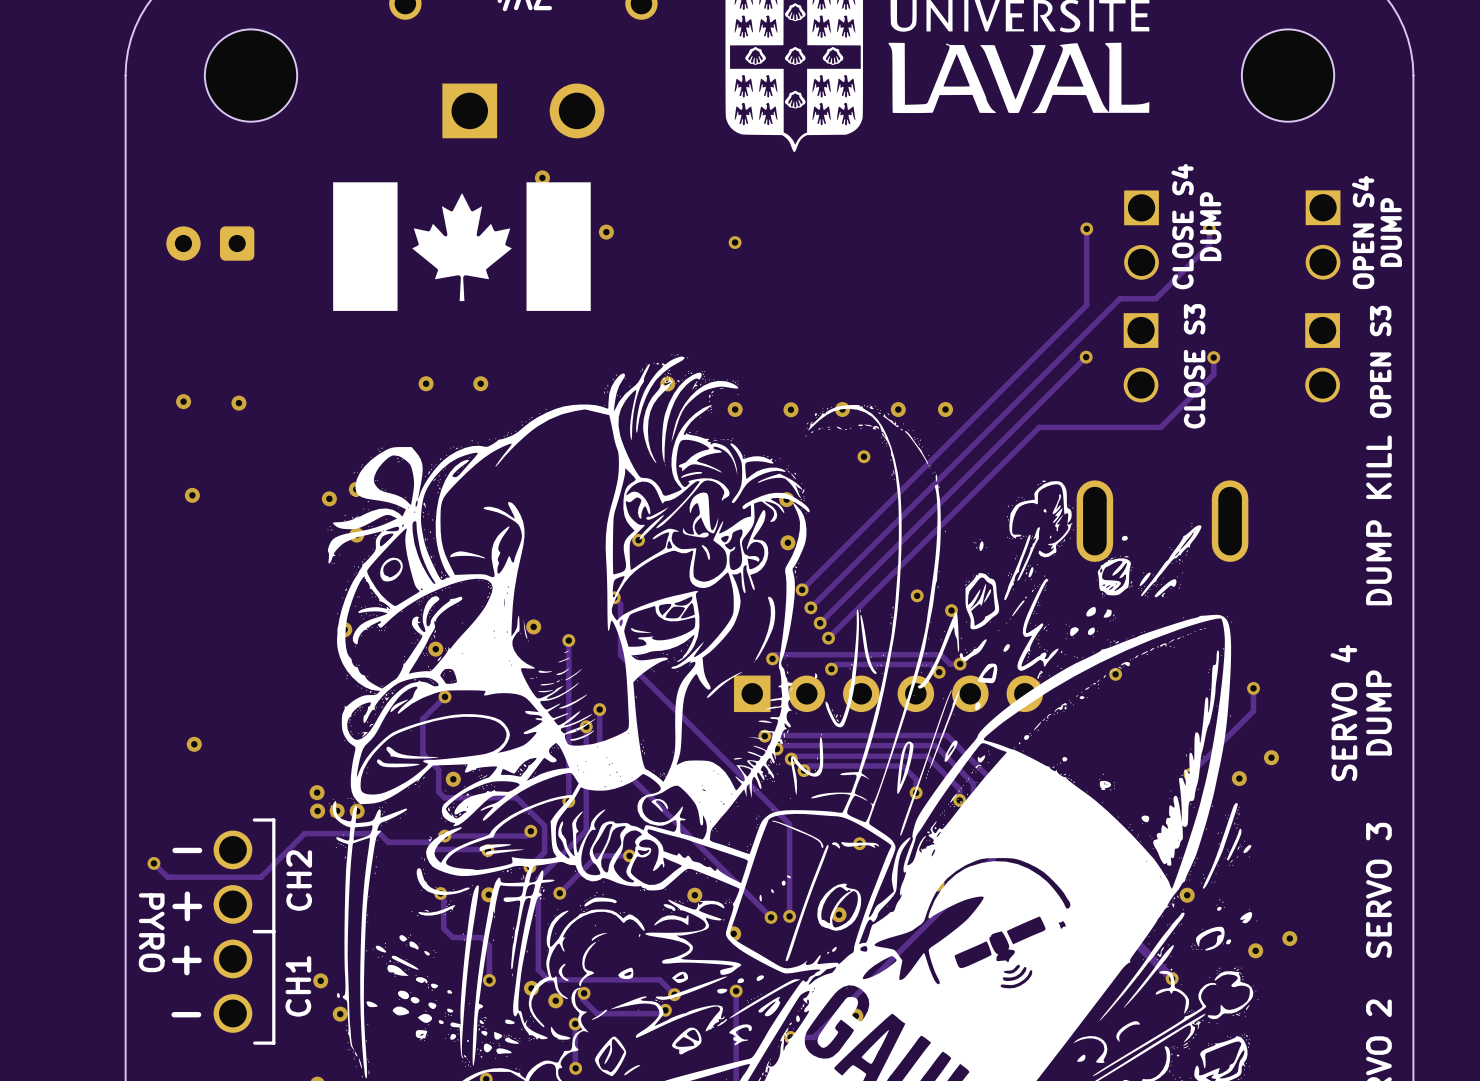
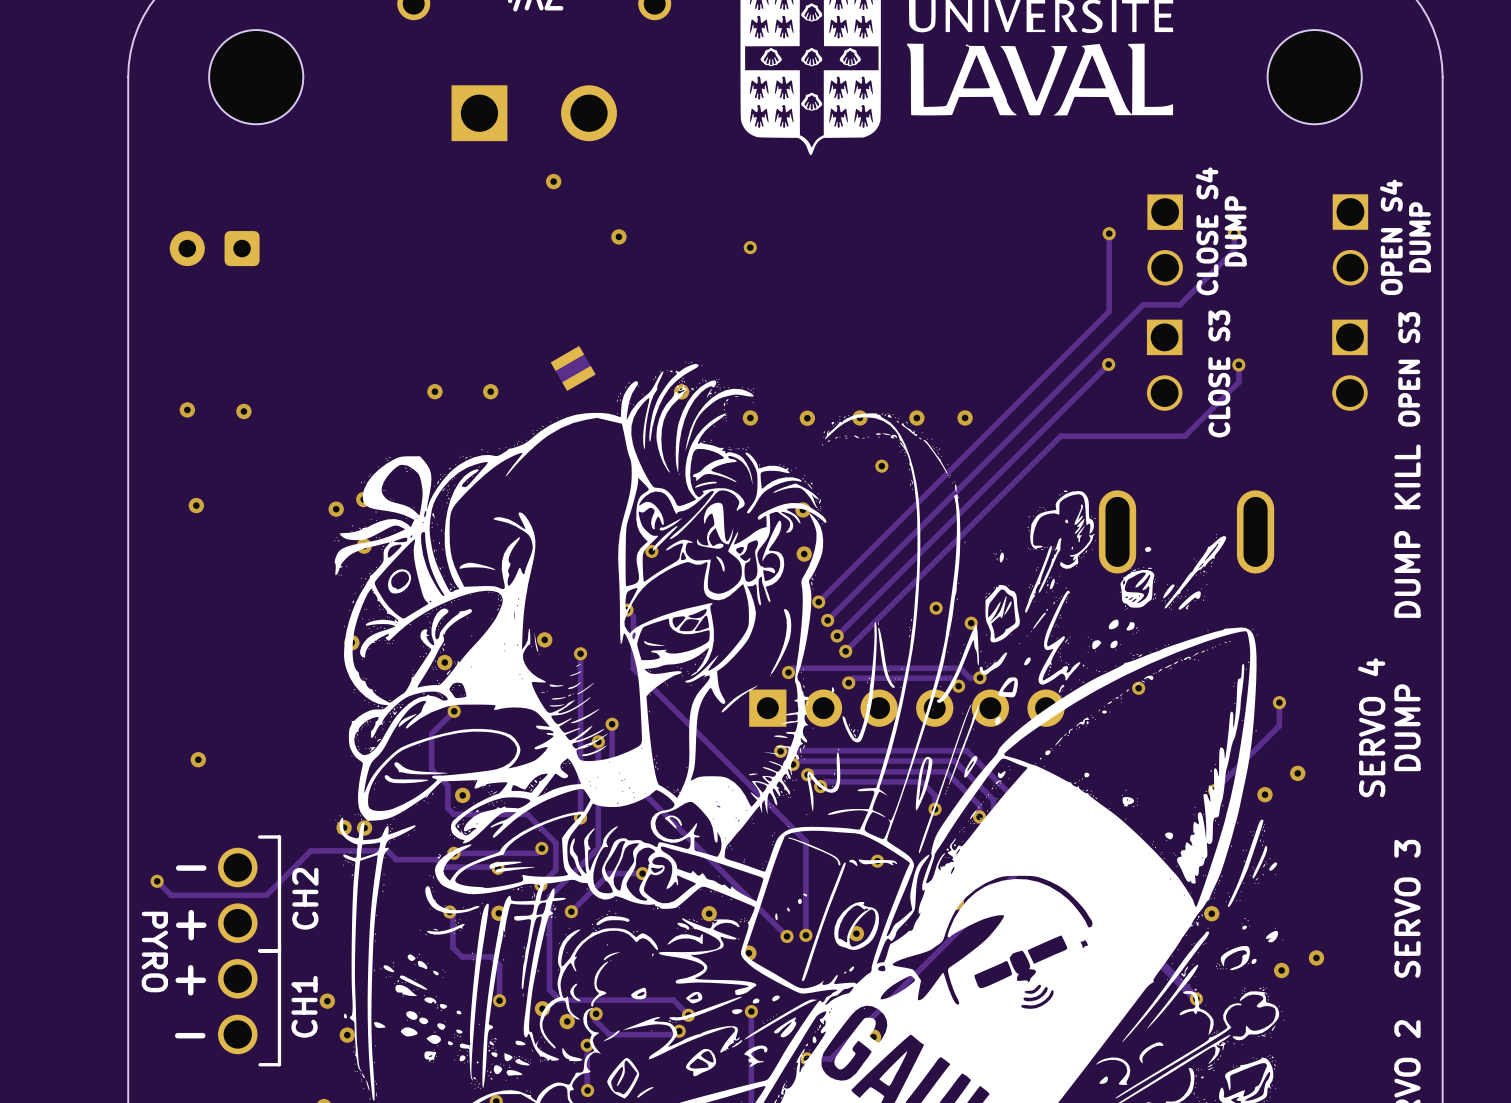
drawing: [333, 182, 591, 311] -> none
part: none -> (573, 368)
via: (317, 792) -> none
via: (317, 811) -> none

